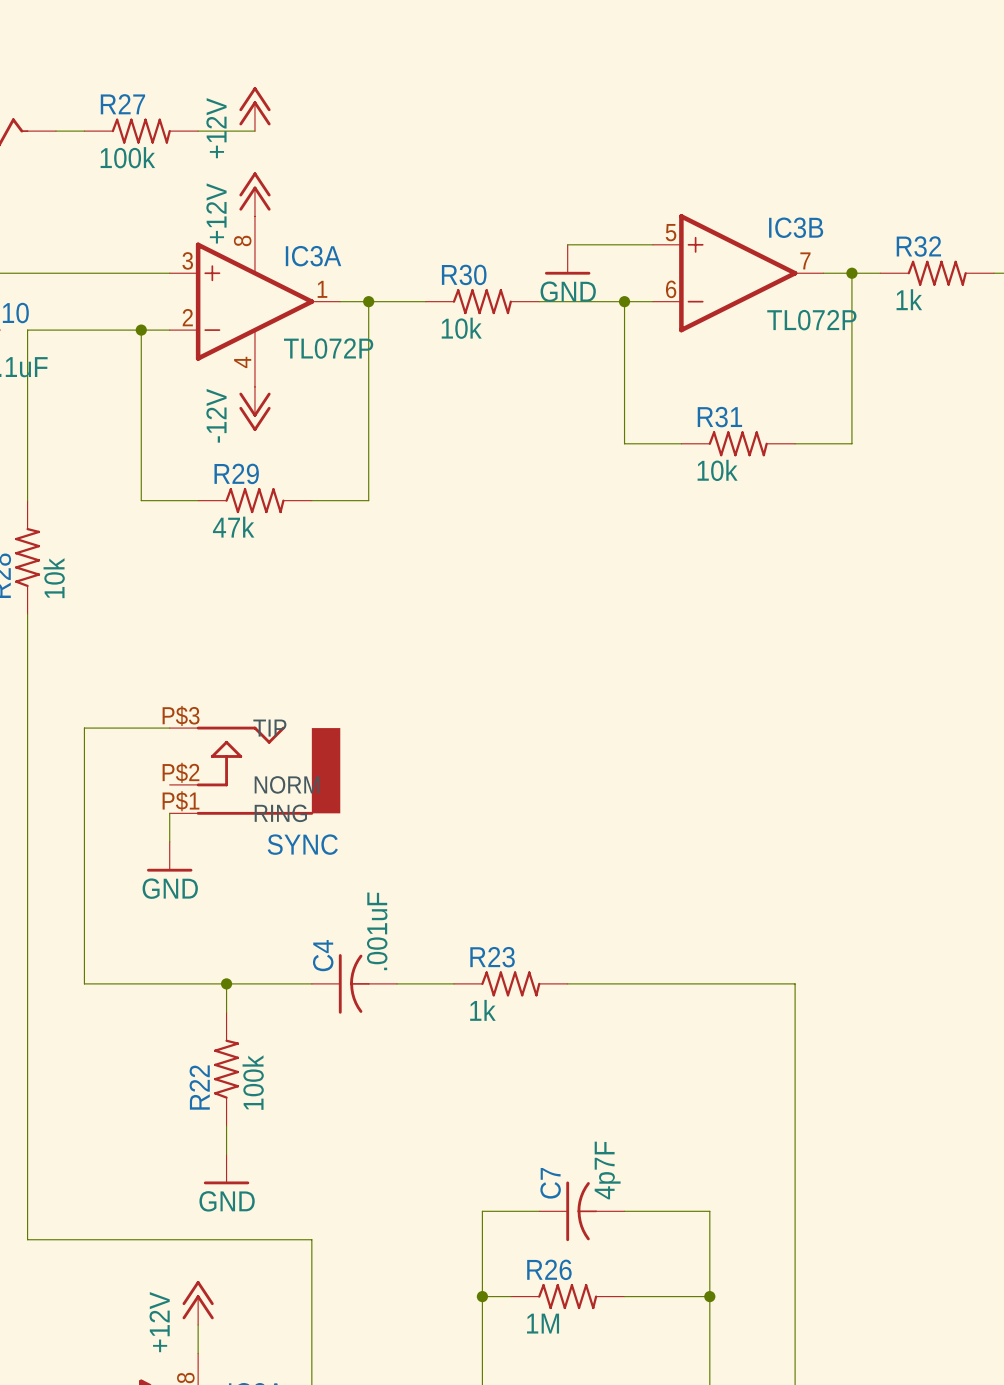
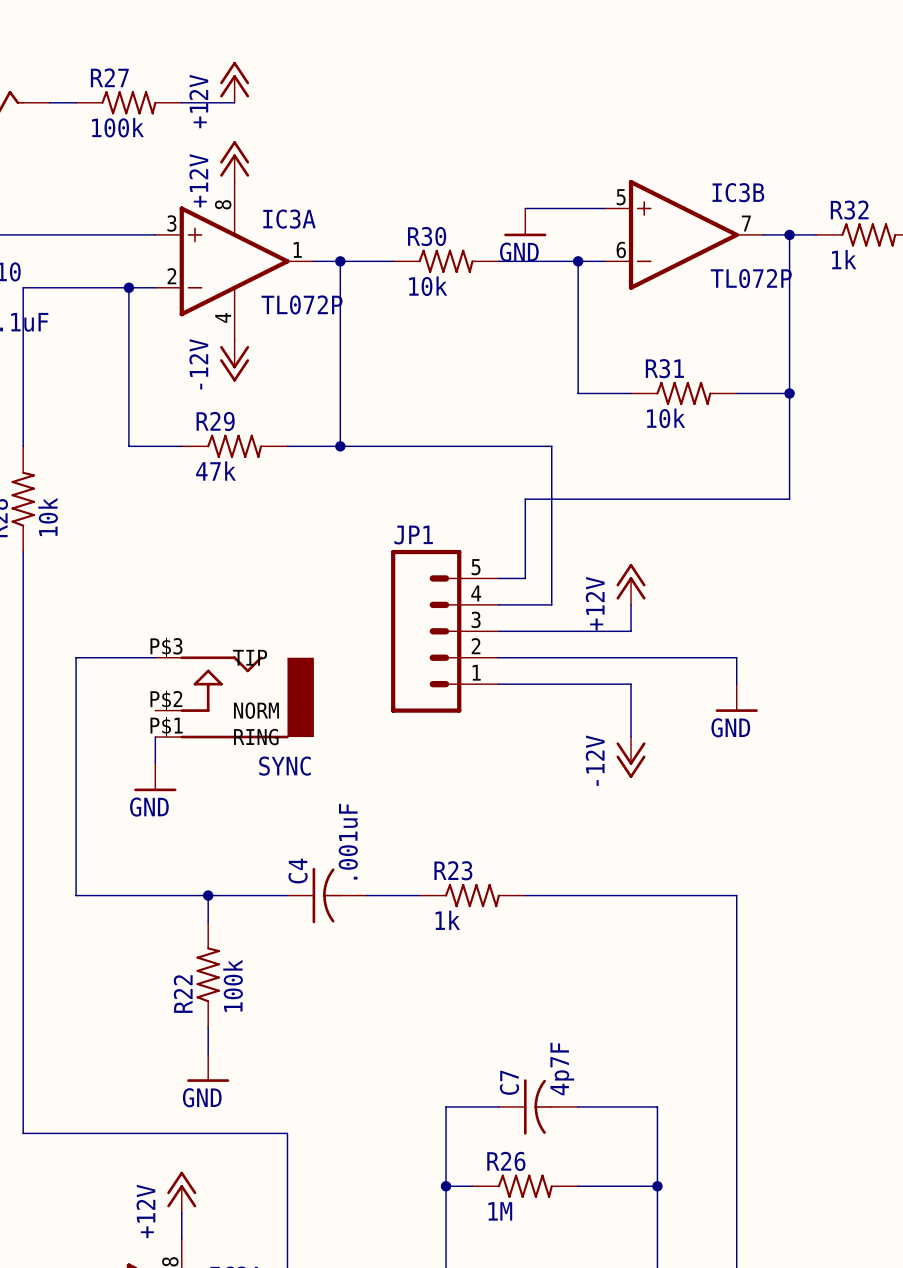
wire: none -> (789, 393) (789, 499) (525, 499) (525, 578) (498, 578)
junction: none -> (789, 393)
wire: none -> (340, 446) (551, 446) (551, 604) (498, 604)
junction: none -> (340, 446)
power symbol: none -> +12V (631, 584)
wire: none -> (631, 604) (631, 631) (498, 631)
JP1: none -> (444, 631)
wire: none -> (498, 657) (736, 657) (736, 684)
wire: none -> (498, 684) (631, 684) (631, 737)
power symbol: none -> GND (736, 698)
power symbol: none -> -12V (631, 757)

